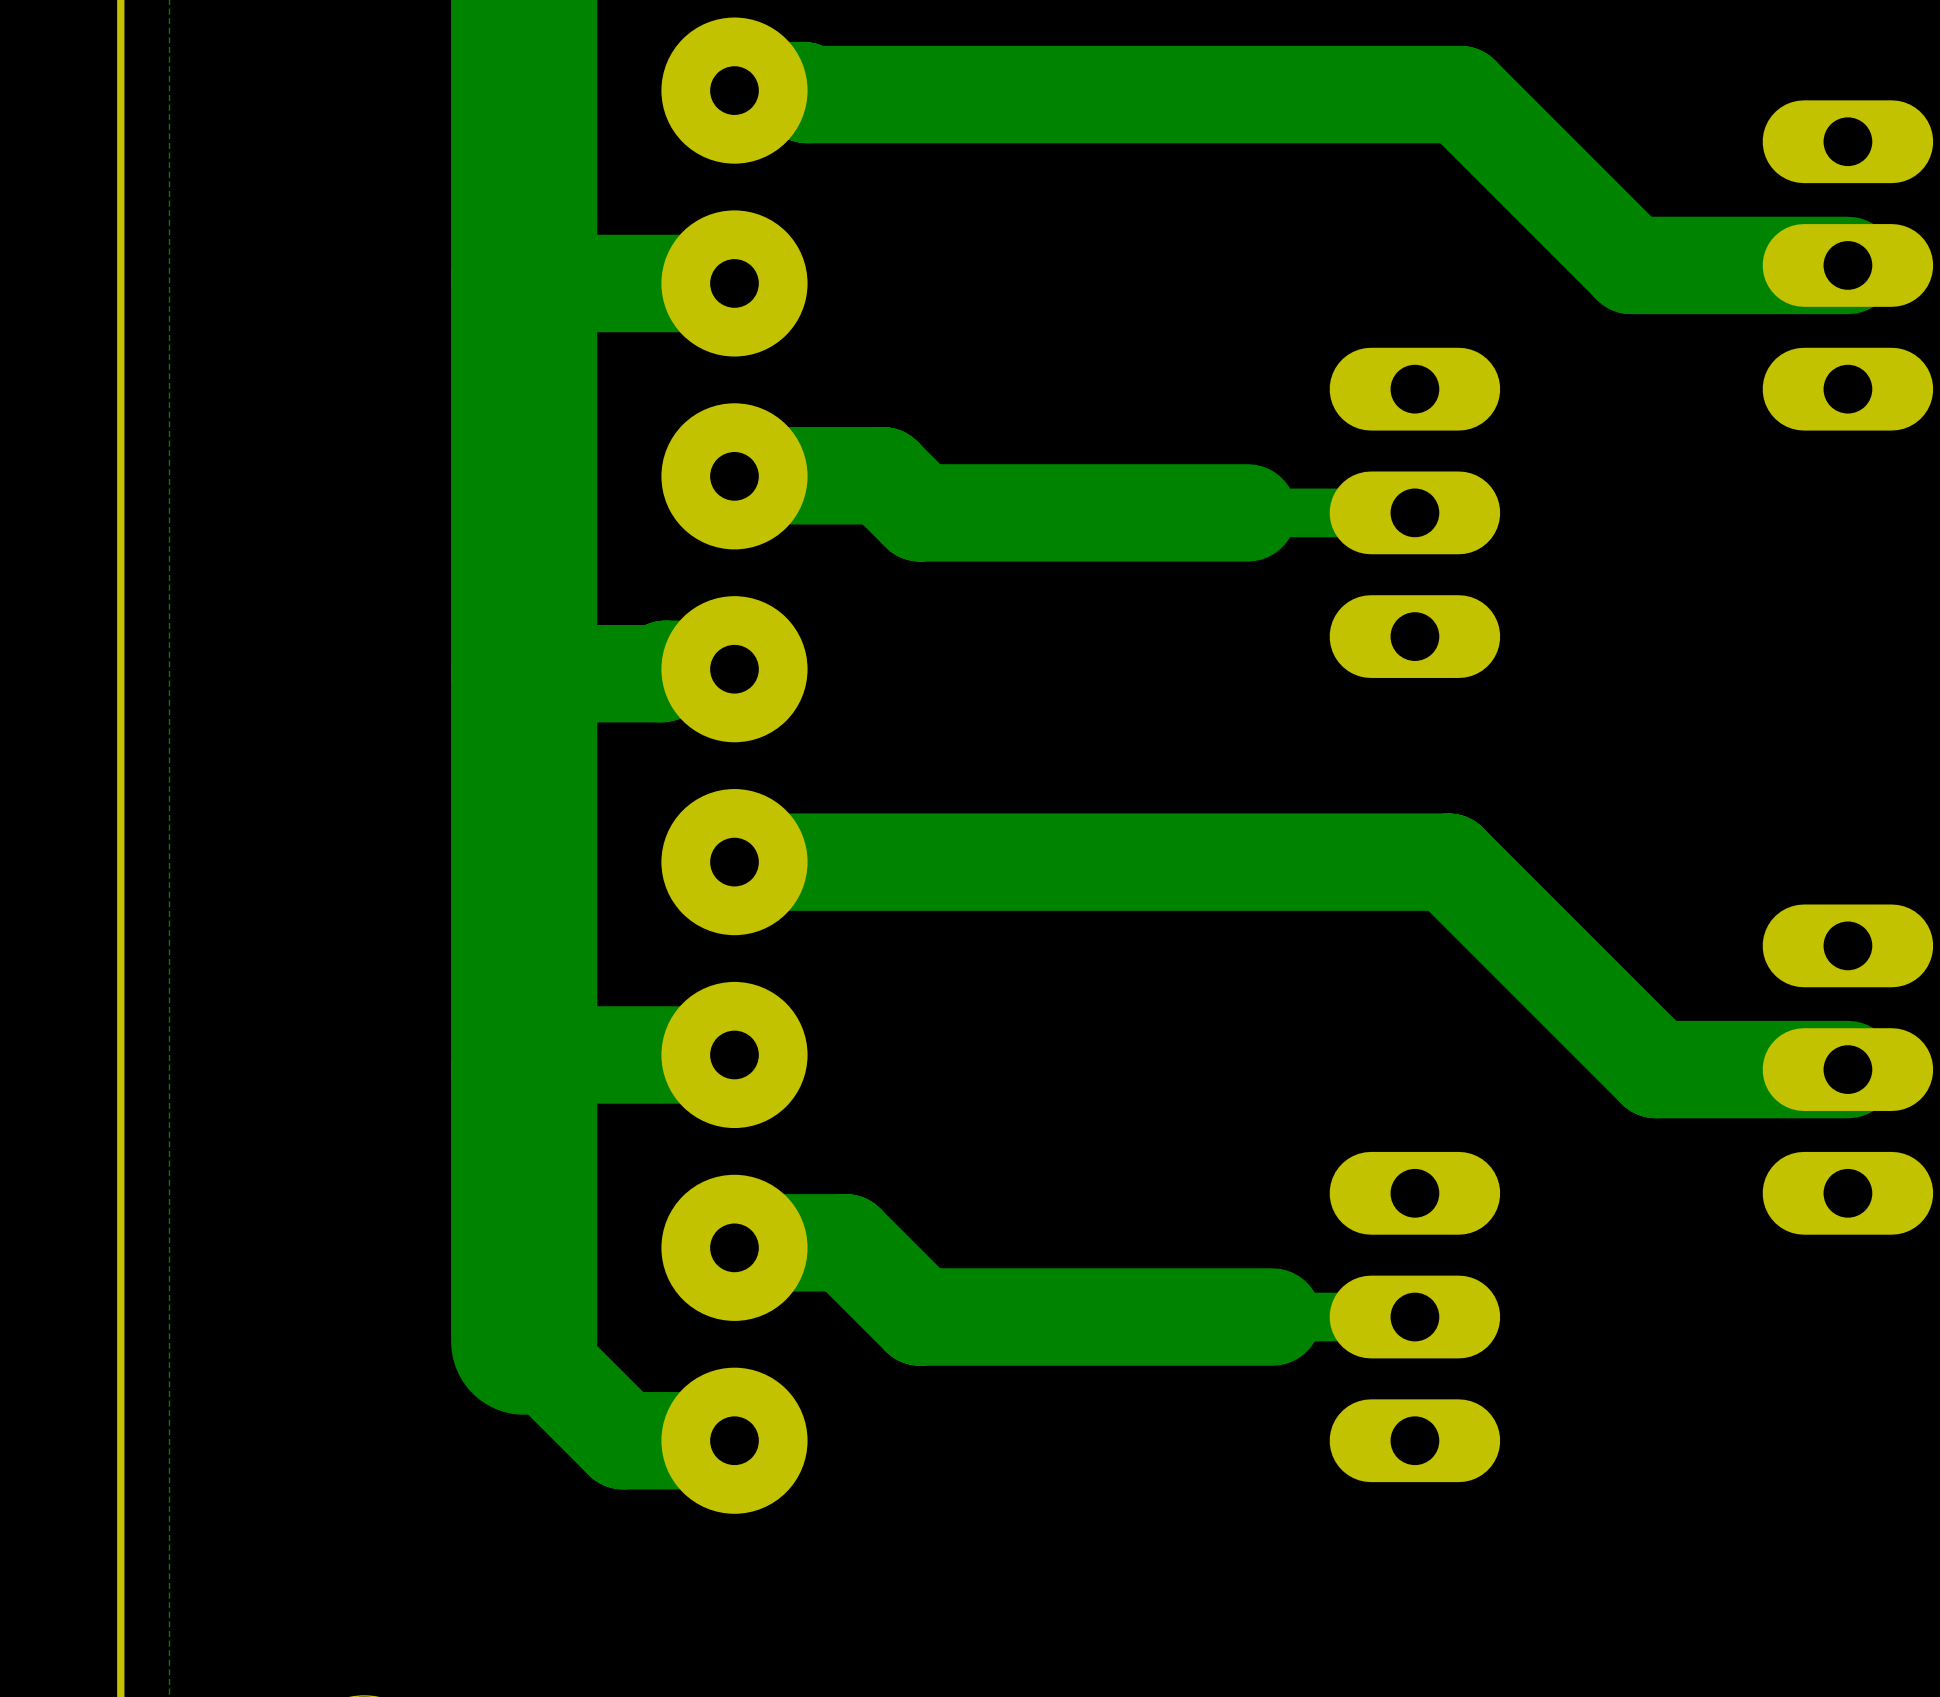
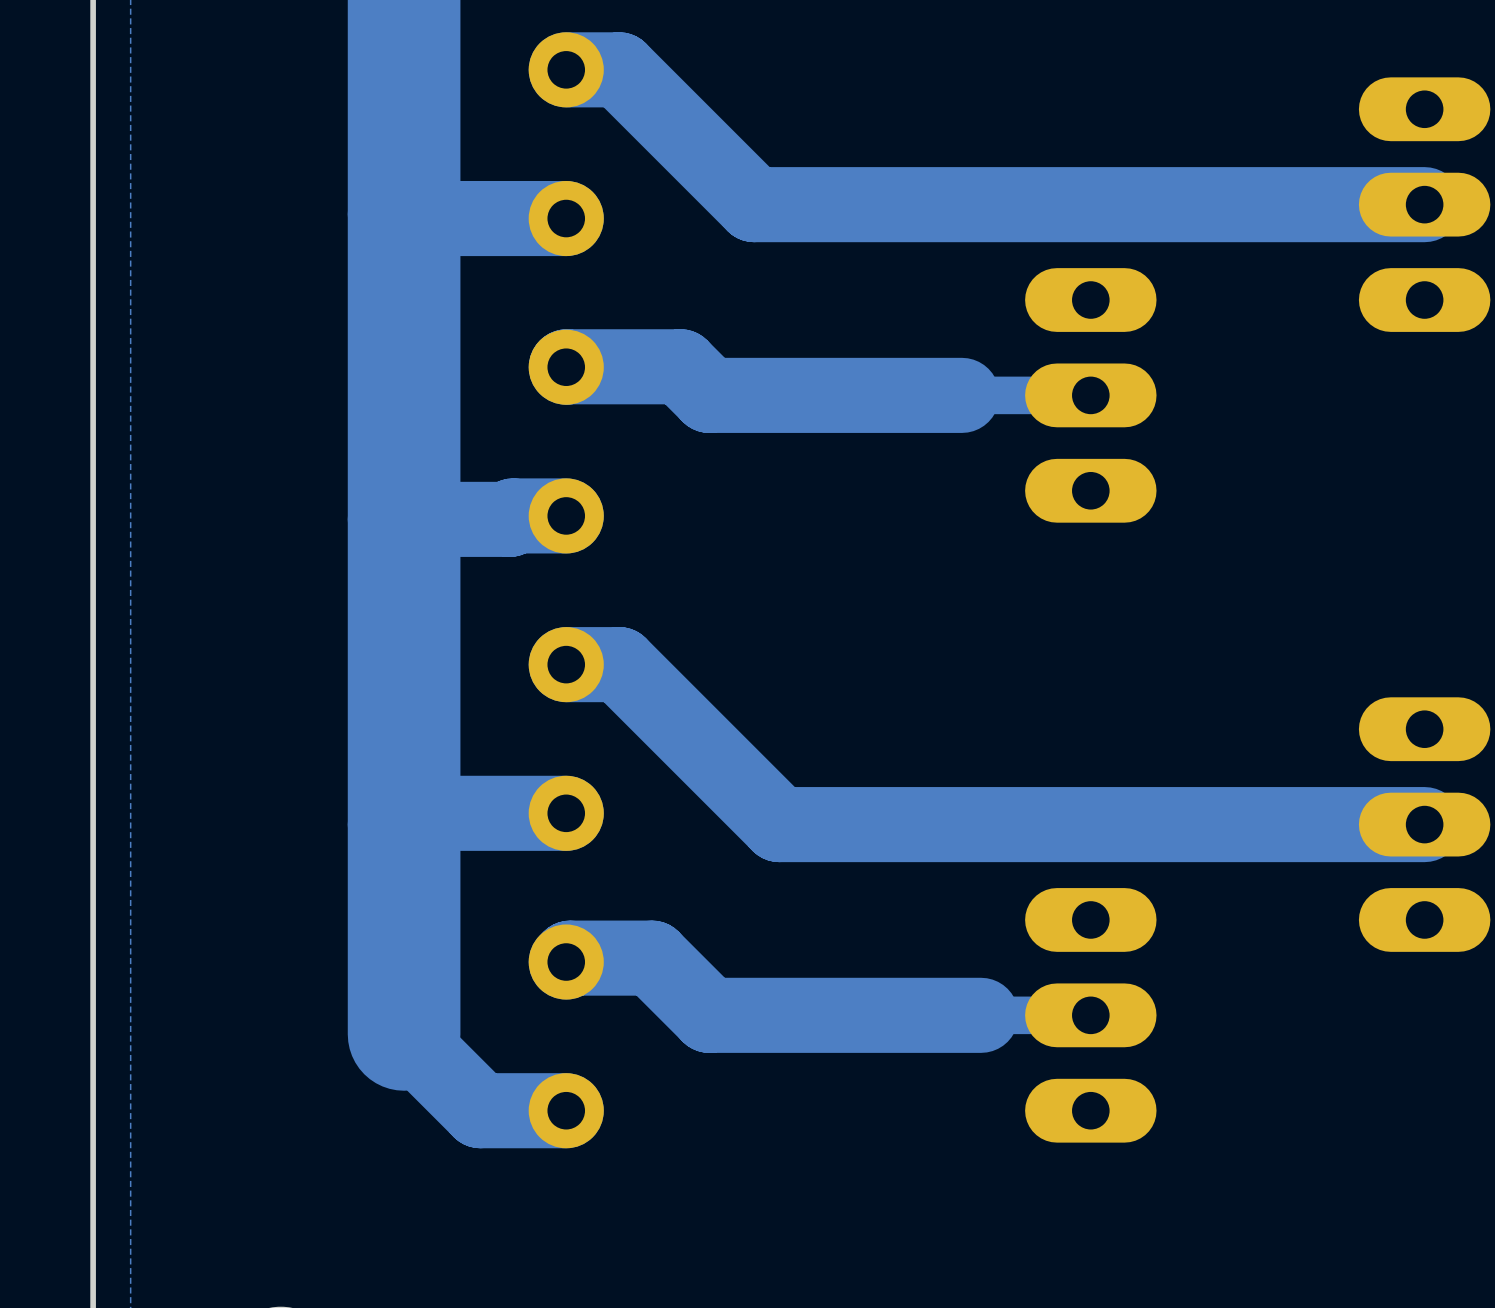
part footprint: [661, 17, 808, 1514] -> [528, 32, 604, 1149]
track: (807, 94) (1460, 94) (1631, 265) -> (622, 72) (754, 204) (1257, 204)
track: (803, 862) (1448, 862) (1656, 1069) -> (619, 664) (779, 824) (1276, 824)

